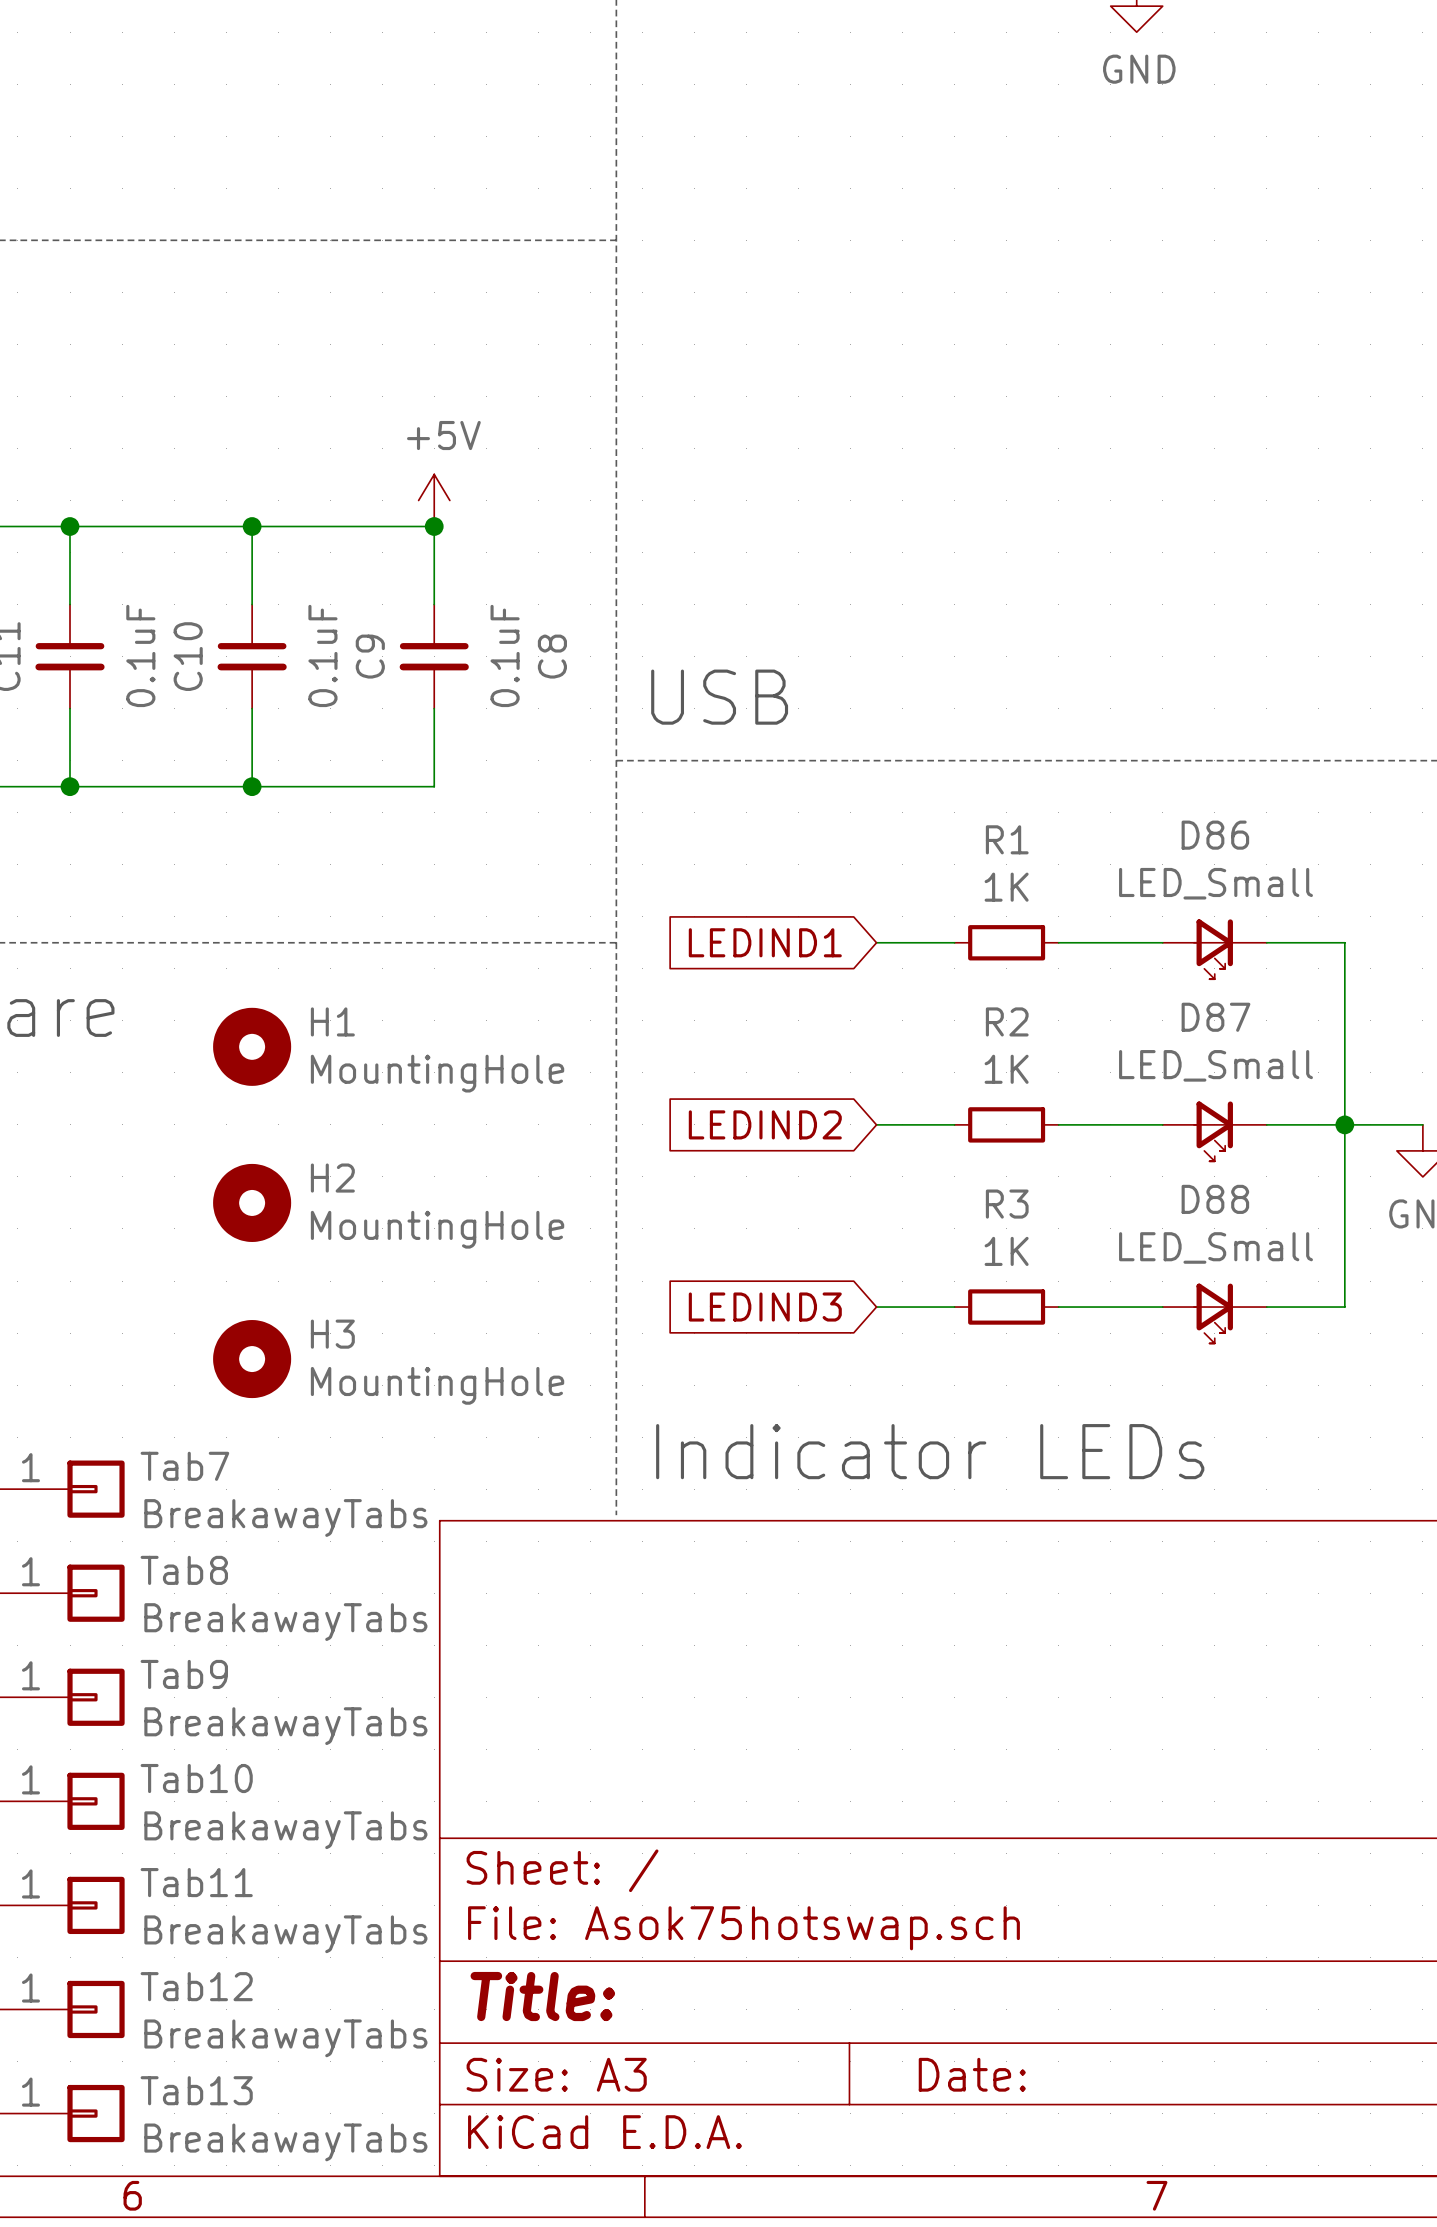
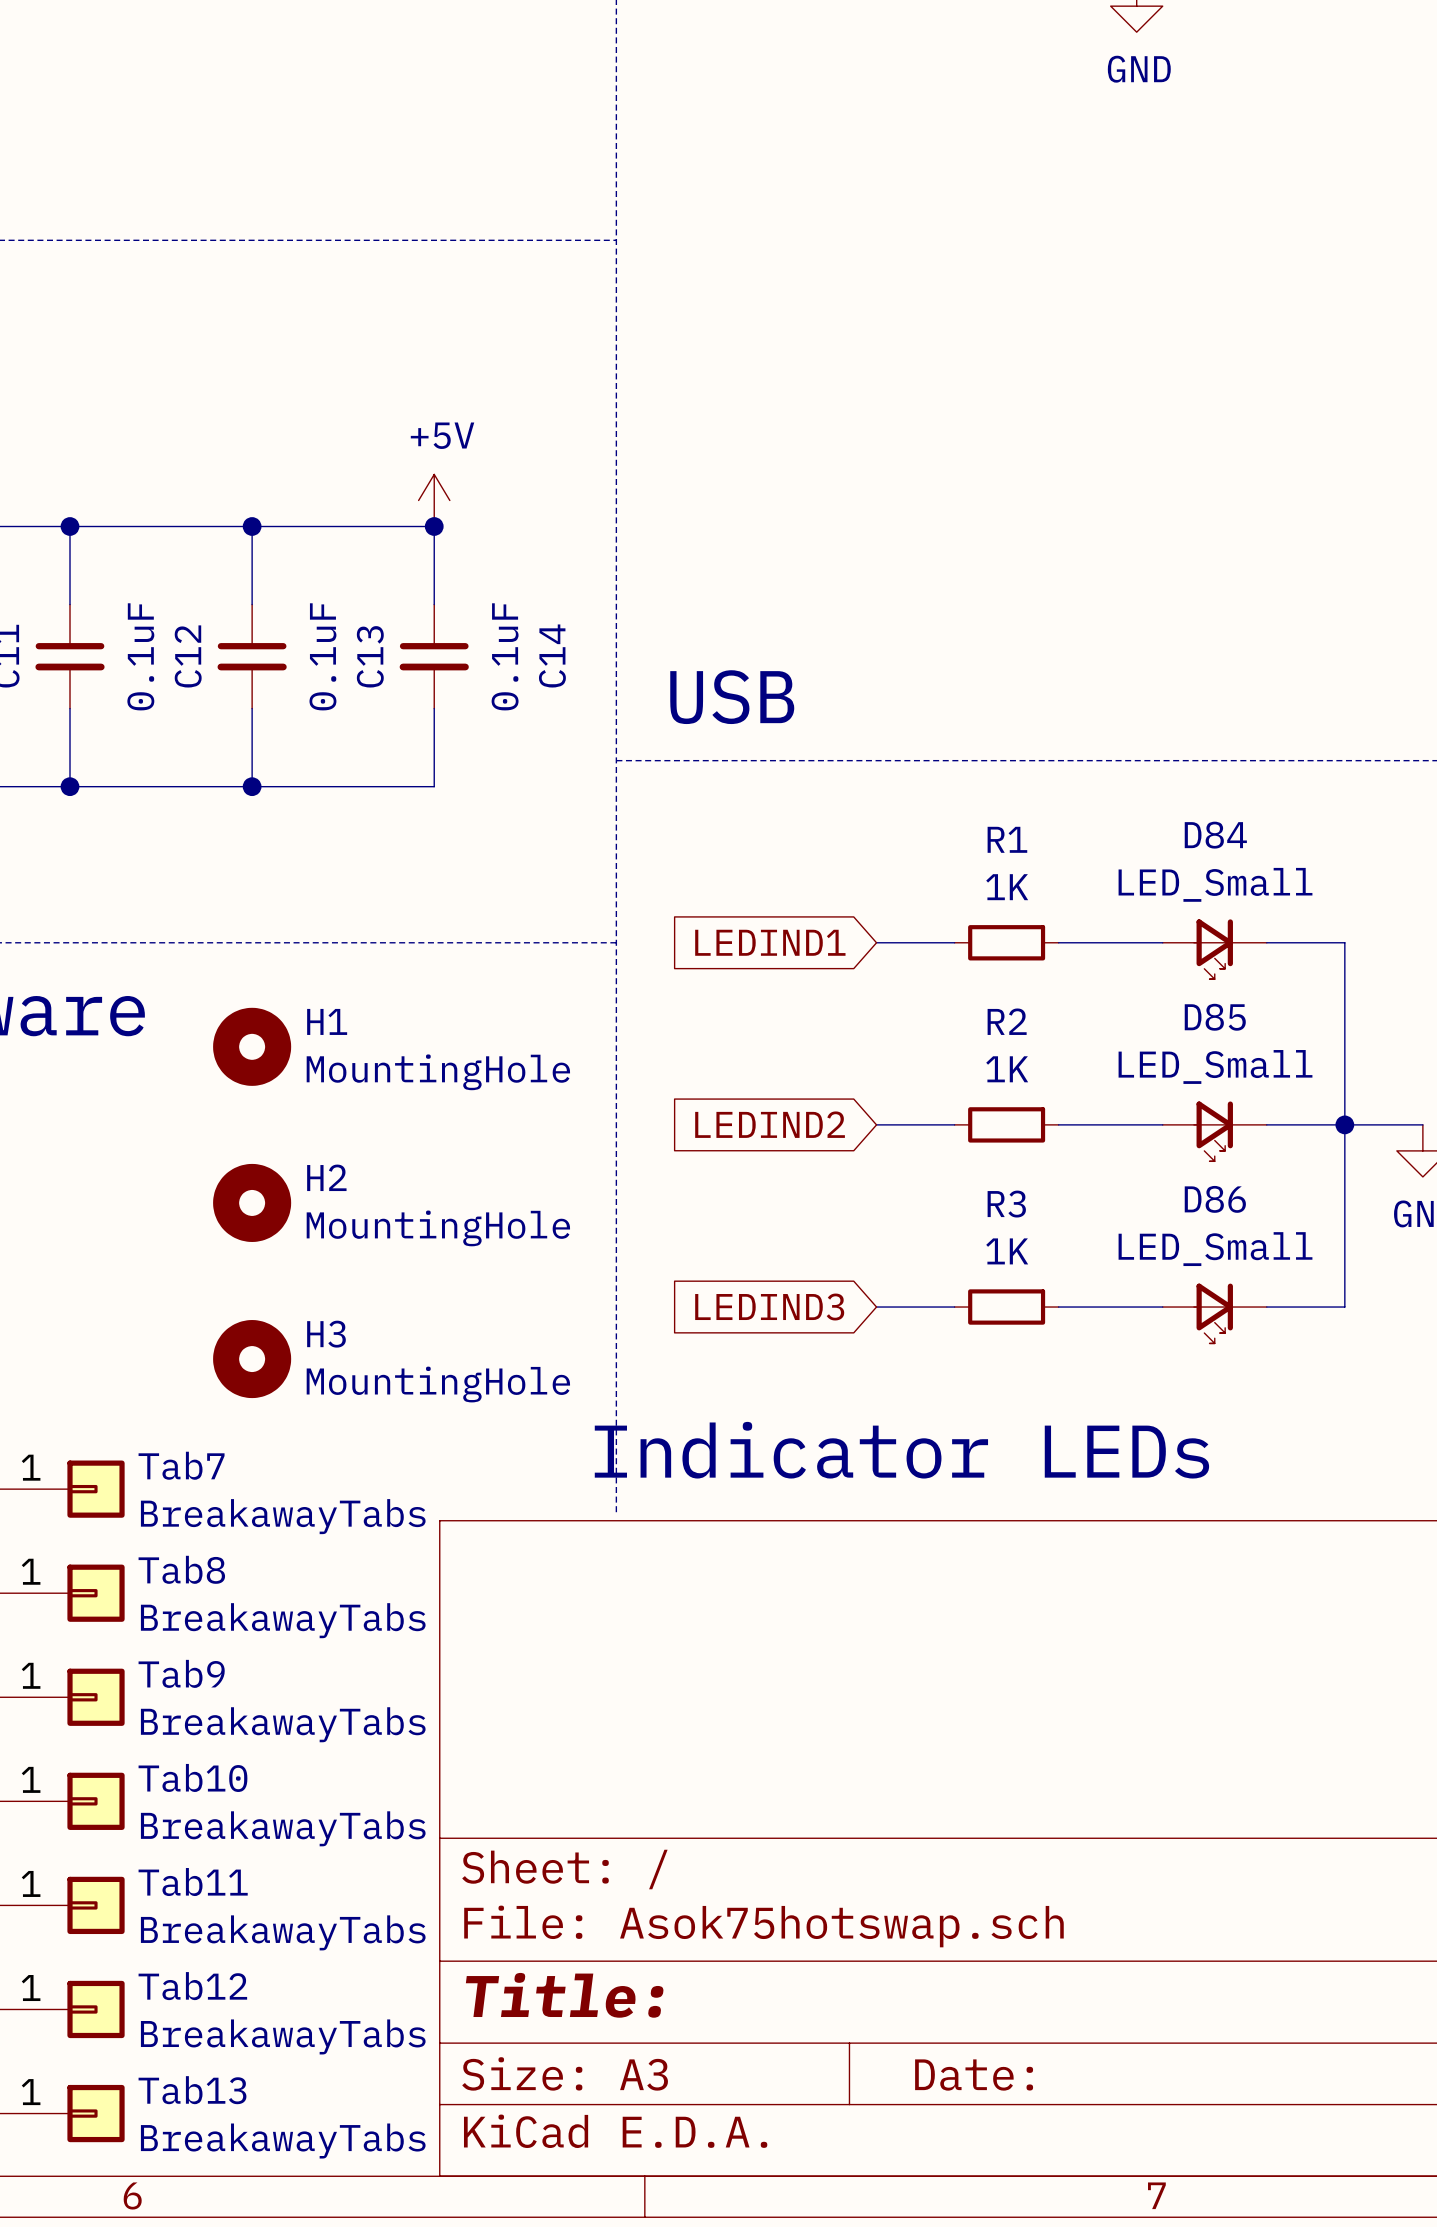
C10 name: C10 (188, 656) -> C12 (188, 656)
C9 name: C9 (370, 656) -> C13 (370, 656)
C8 name: C8 (552, 656) -> C14 (552, 655)
D86 name: D86 (1215, 835) -> D84 (1215, 835)
D87 name: D87 (1215, 1017) -> D85 (1215, 1017)
D88 name: D88 (1215, 1199) -> D86 (1215, 1199)

